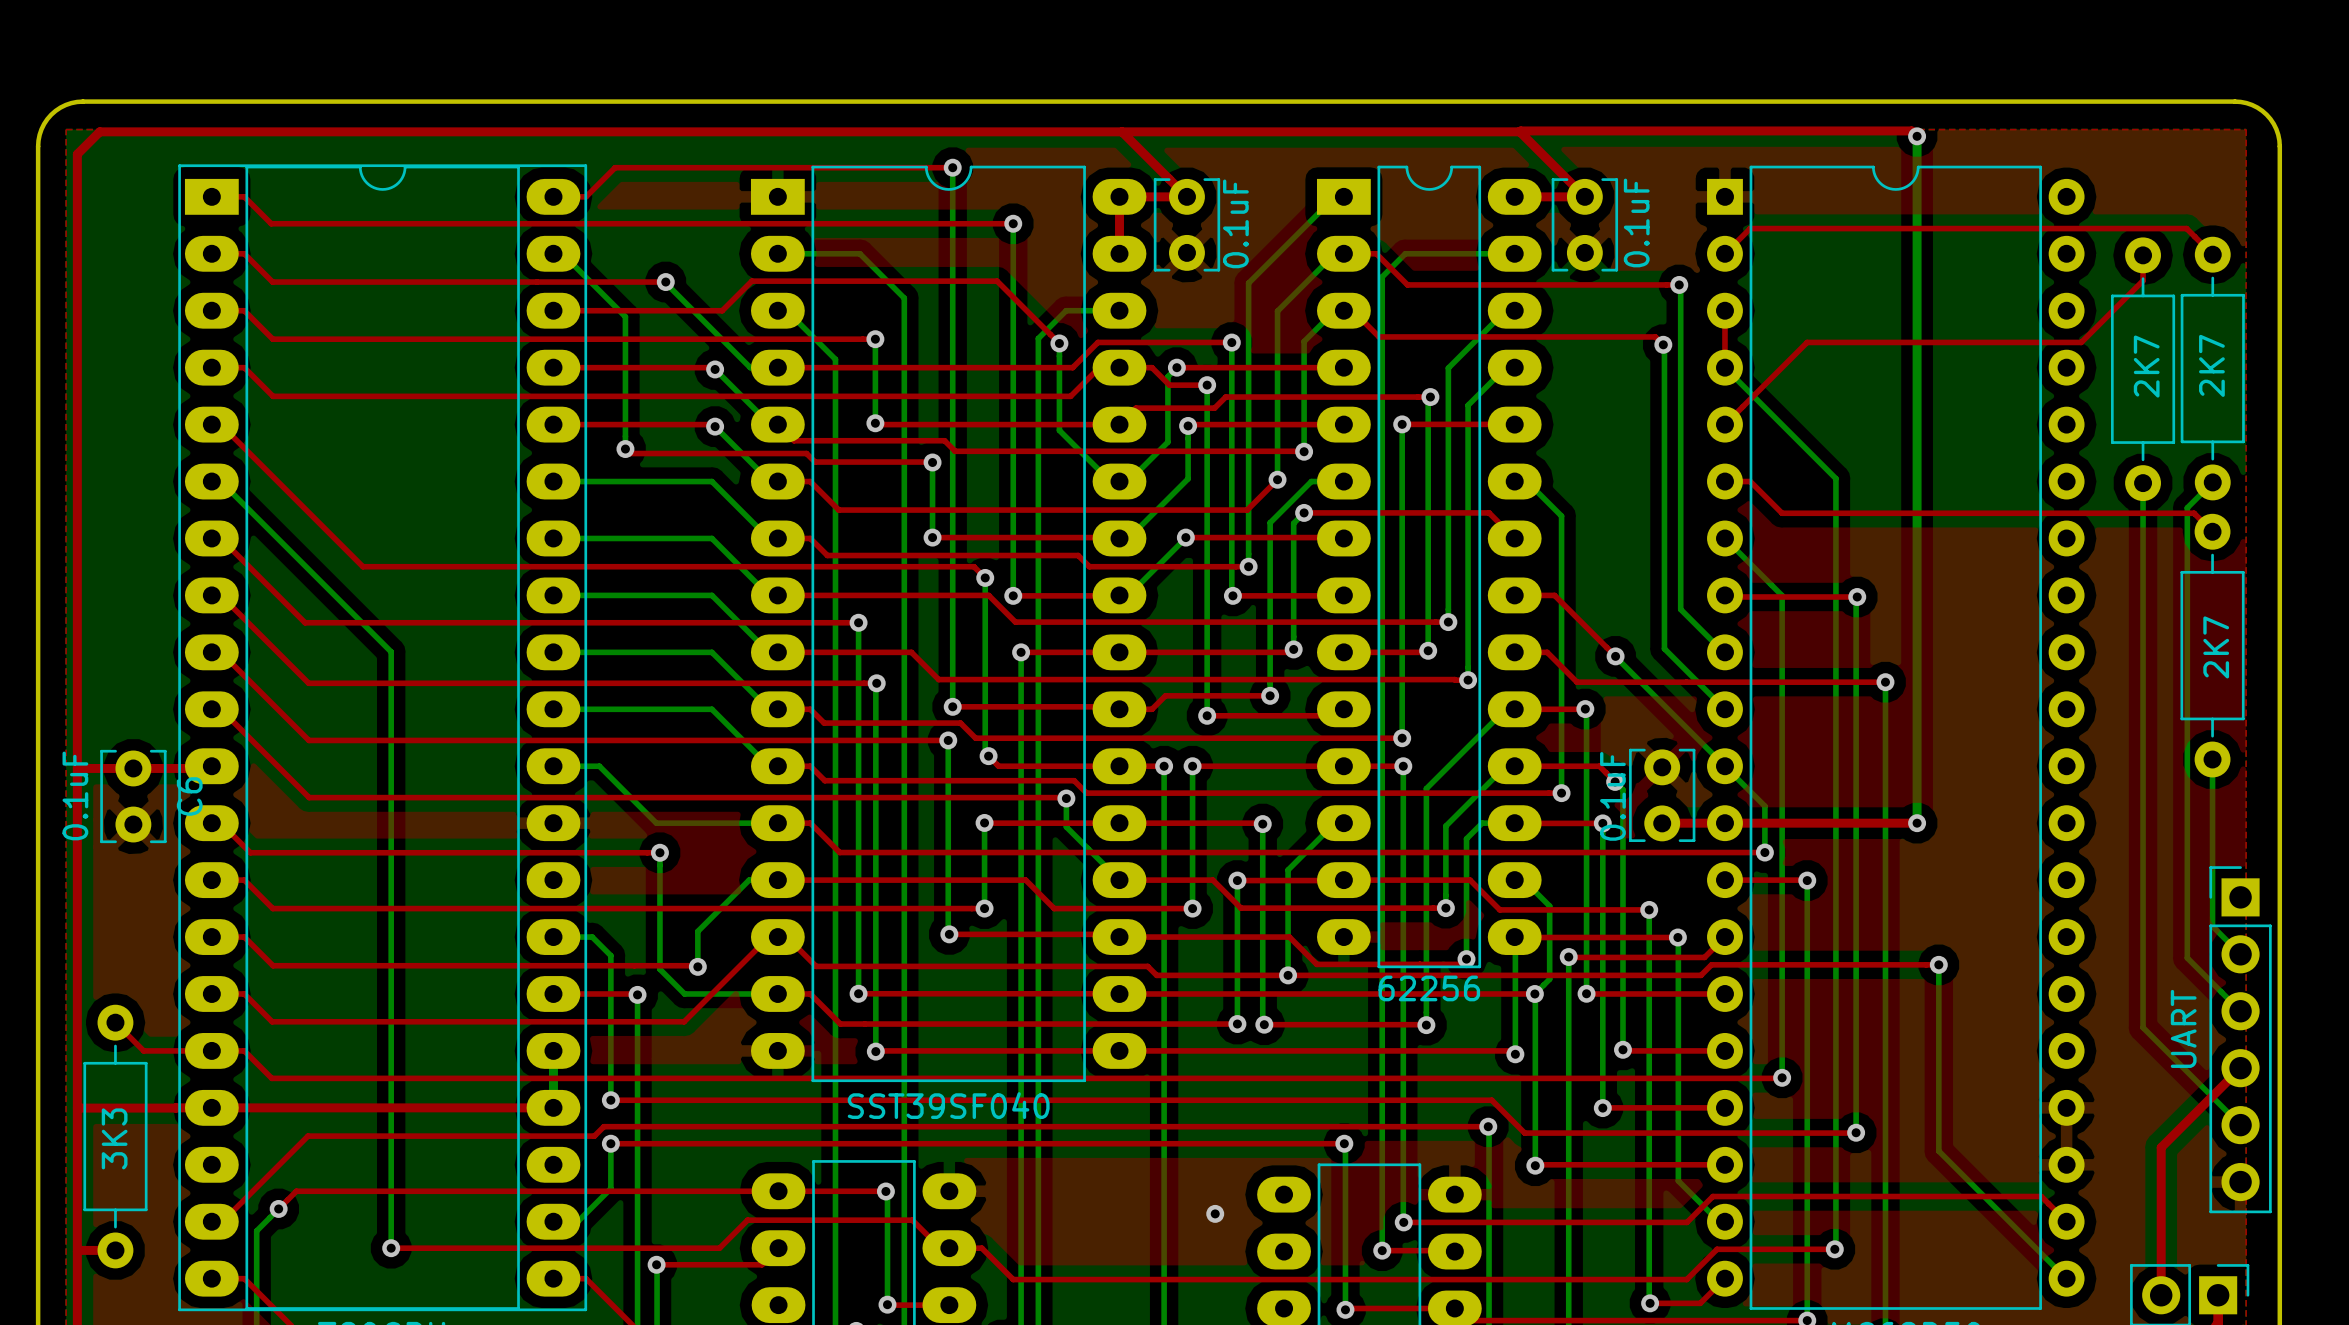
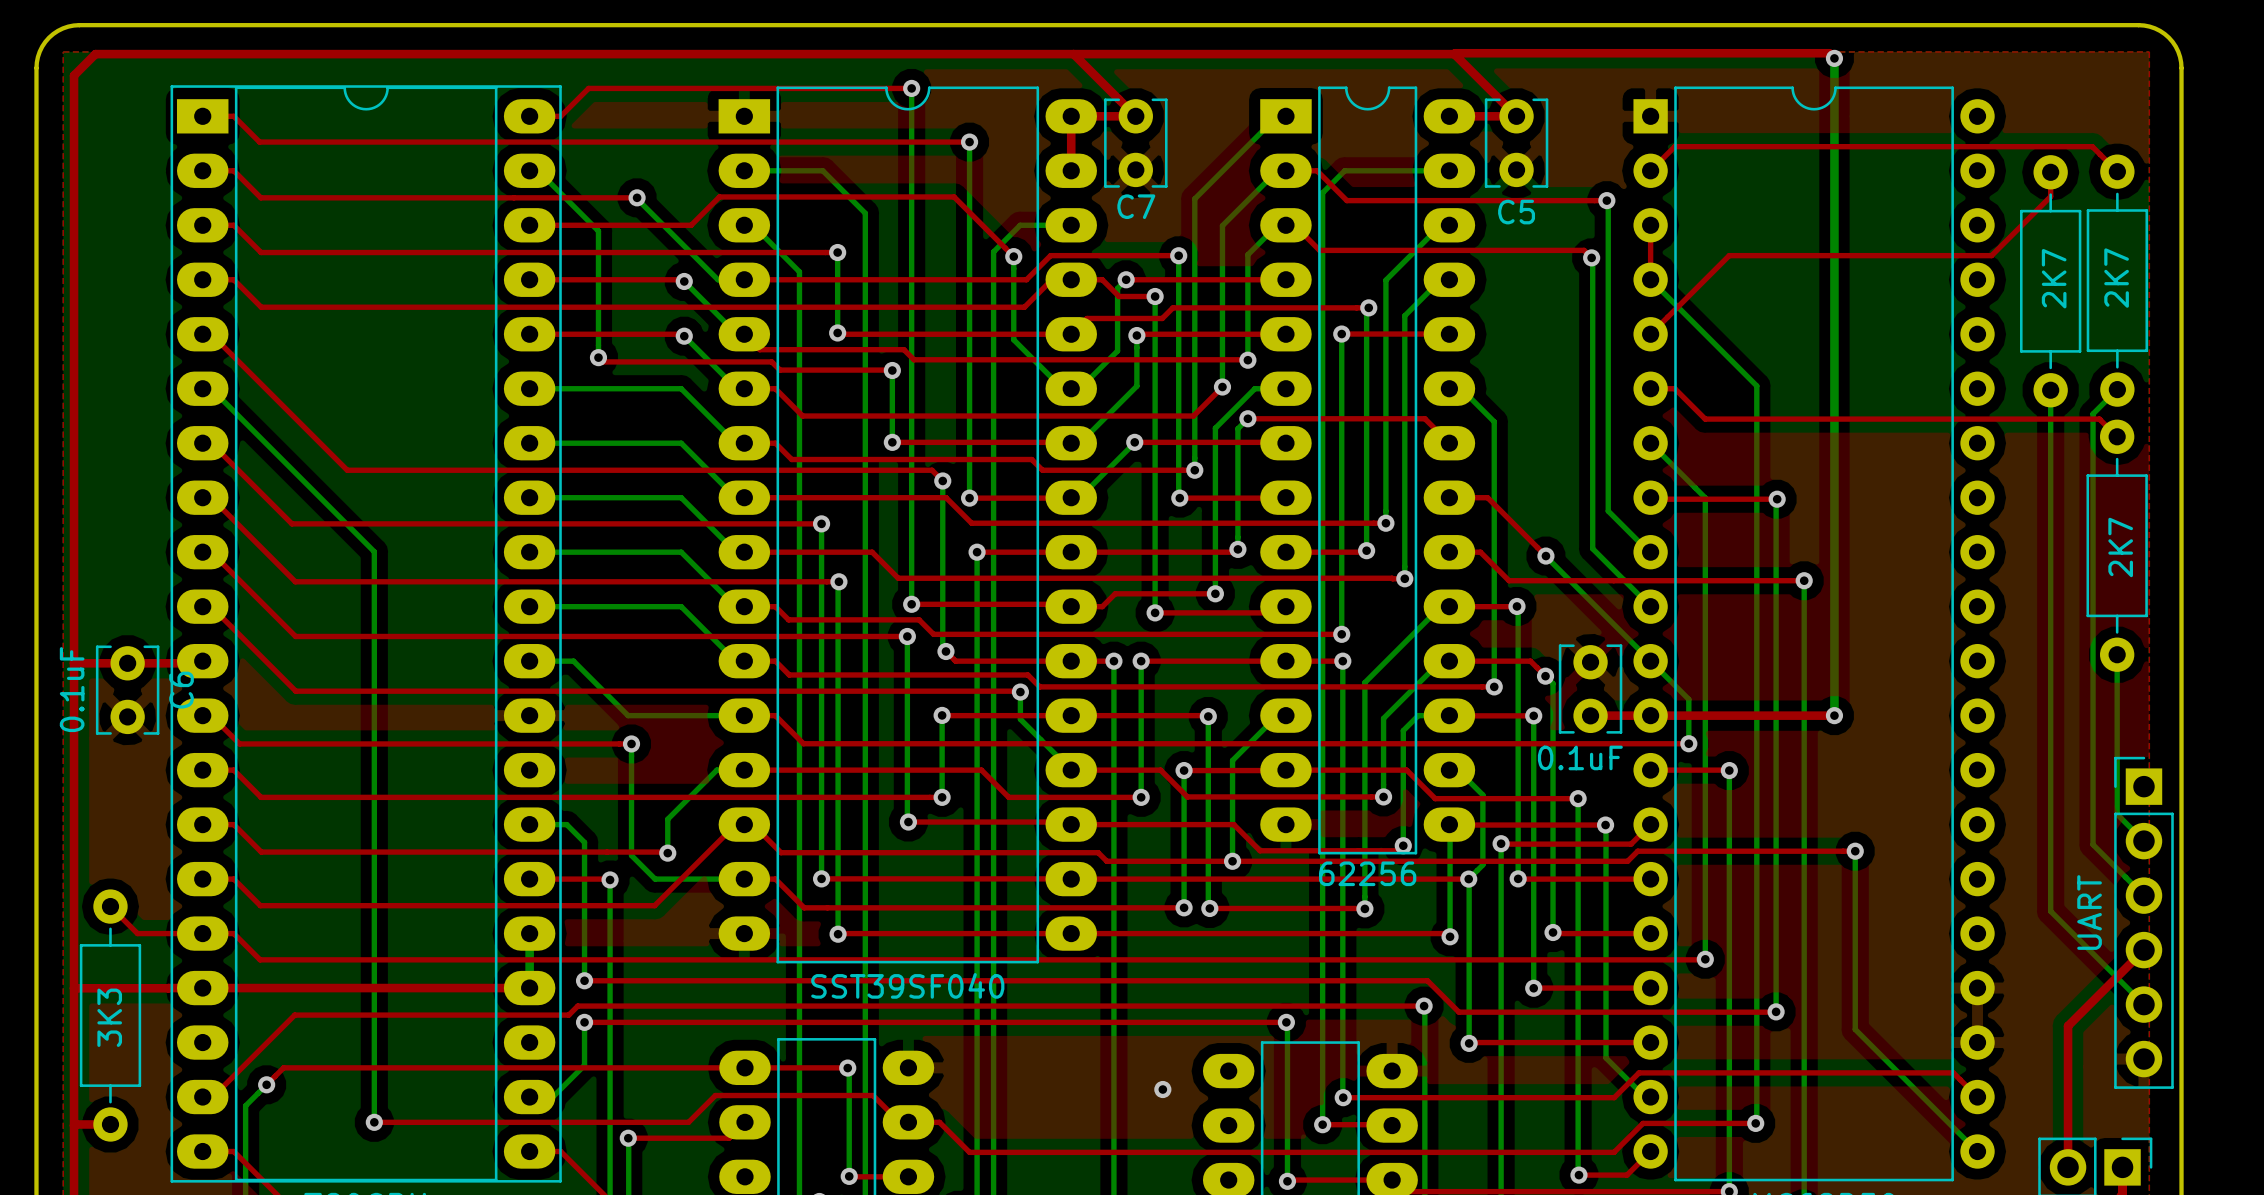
C5 value: 0.1uF (1636, 222) -> none
C7 value: 0.1uF (1235, 223) -> none
C7 name: none -> C7 (1136, 206)
C5 name: none -> C5 (1516, 212)
part value rotation: 0° (1612, 796) -> 90° clockwise (1580, 757)

